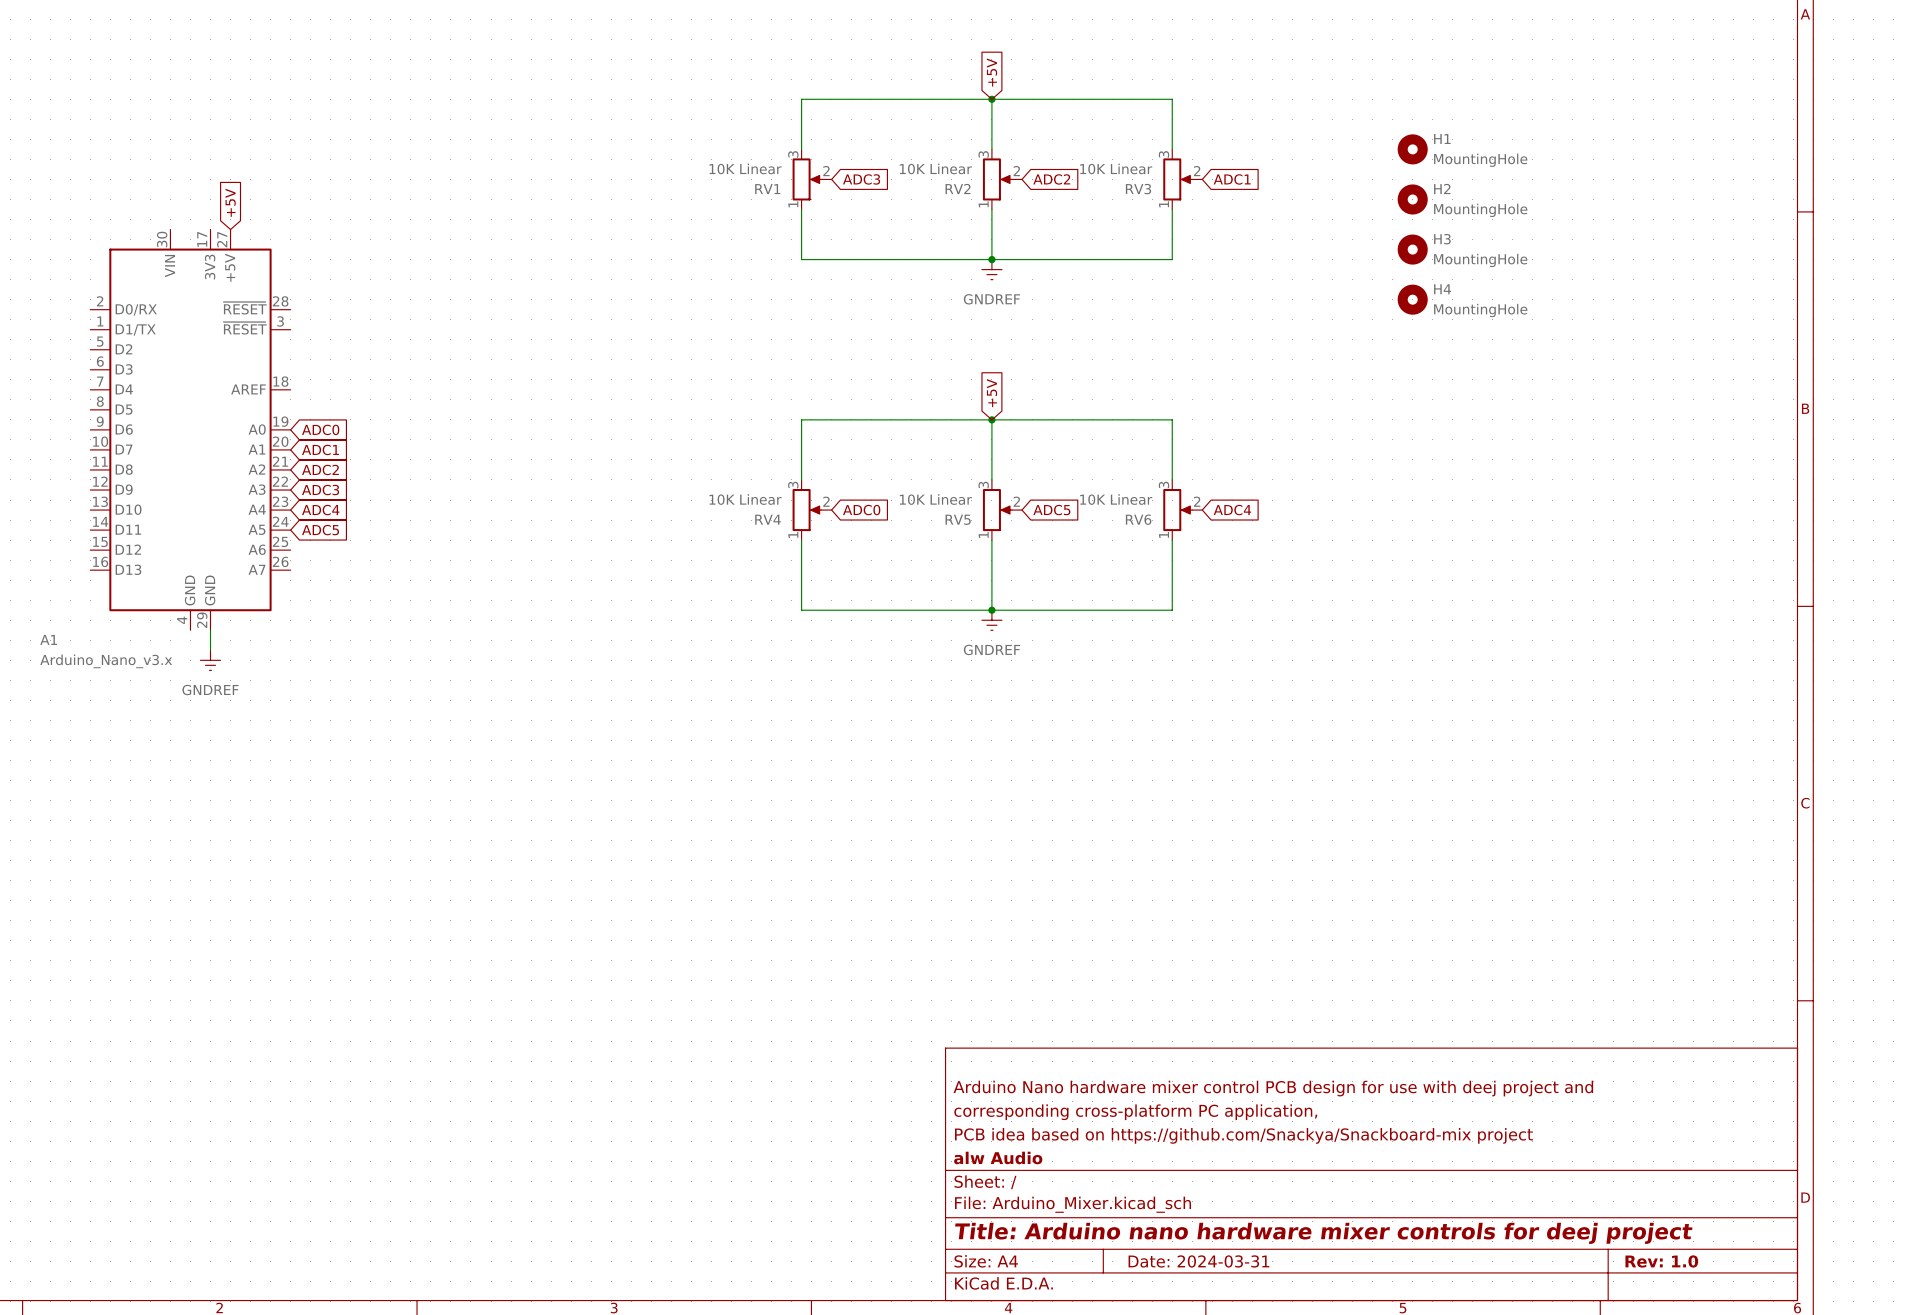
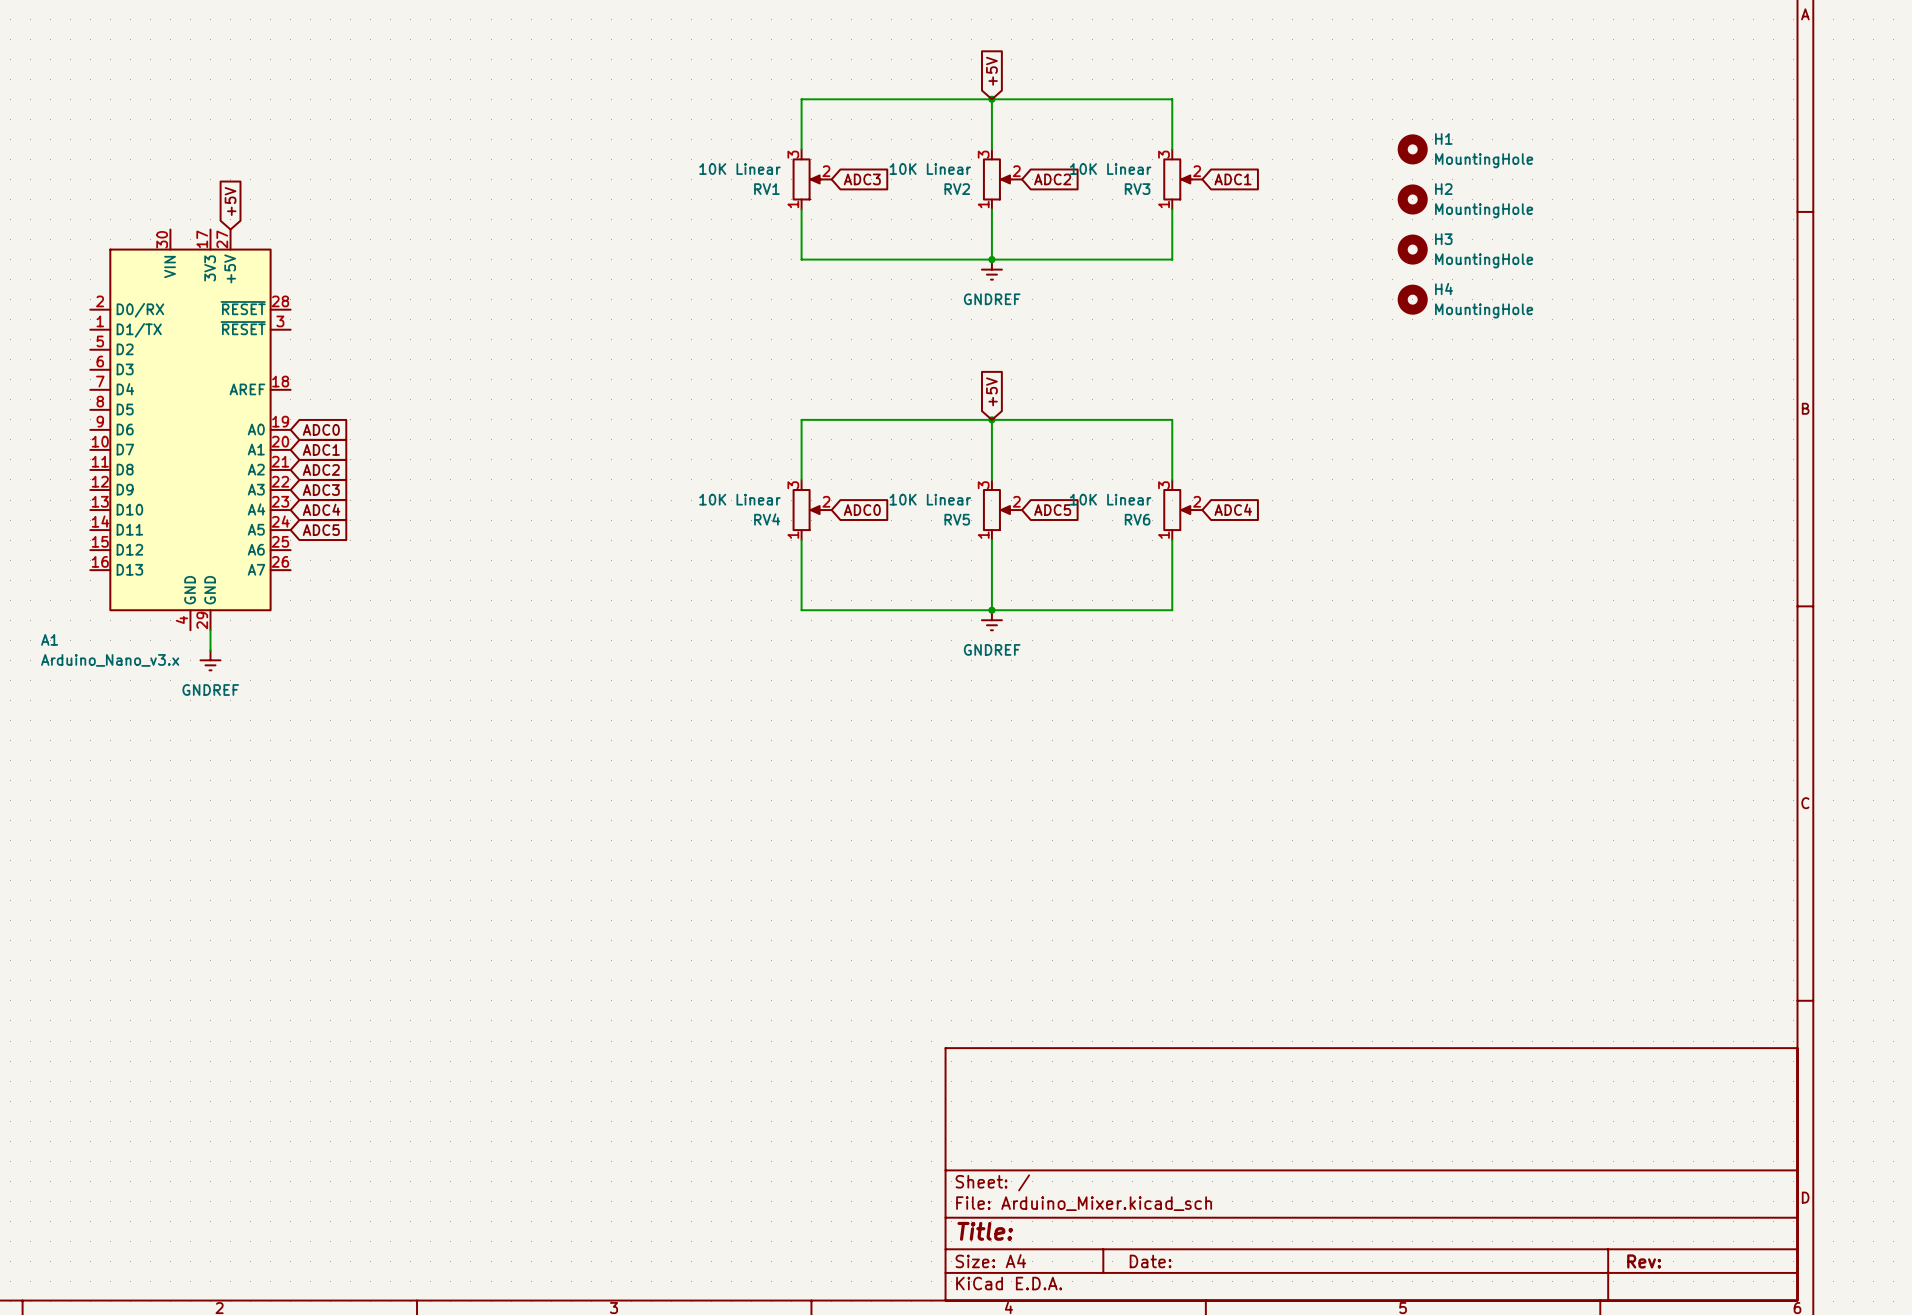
title block: Arduino Nano hardware mixer control PCB design for use with deej project and (1273, 1088) -> none
title block: corresponding cross-platform PC application, (1135, 1112) -> none
title block: PCB idea based on https://github.com/Snackya/Snackboard-mix project (1243, 1135) -> none
title block: alw Audio (998, 1157) -> none
title block: Title: Arduino nano hardware mixer controls for deej project (1323, 1233) -> Title: (985, 1231)
title block: Date: 2024-03-31 (1198, 1261) -> Date: (1150, 1261)
title block: Rev: 1.0 (1661, 1261) -> Rev: (1644, 1261)

